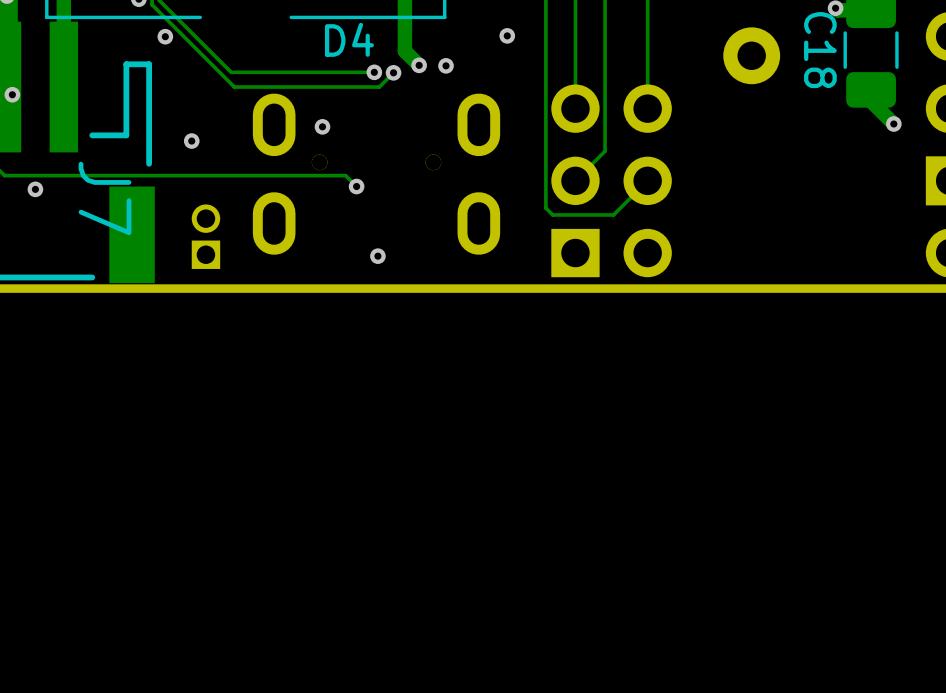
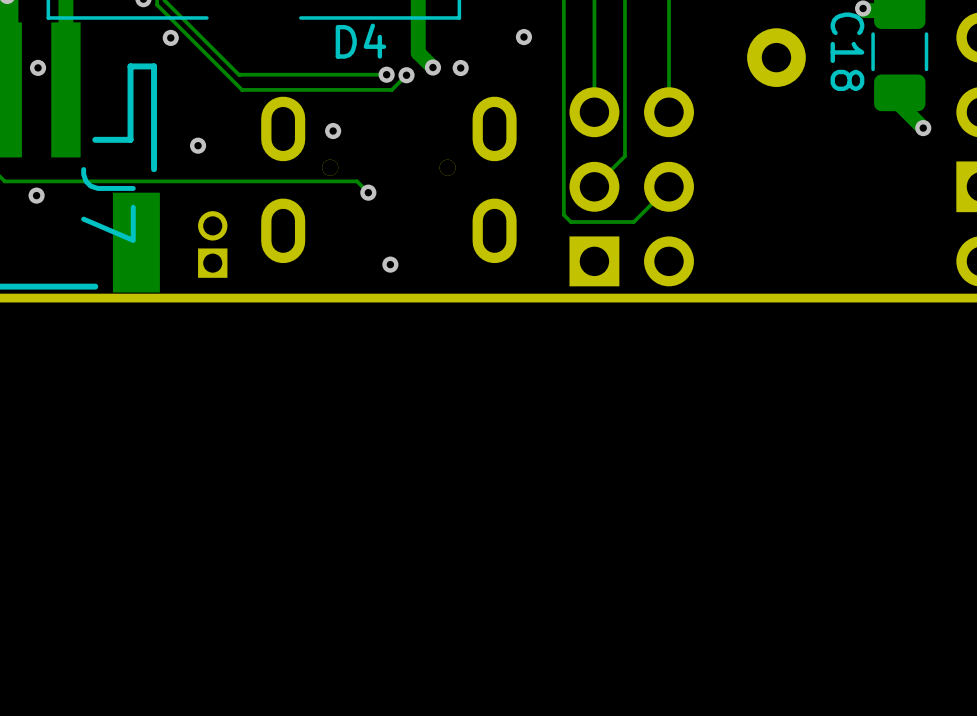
via position: (12, 94) -> (38, 67)

